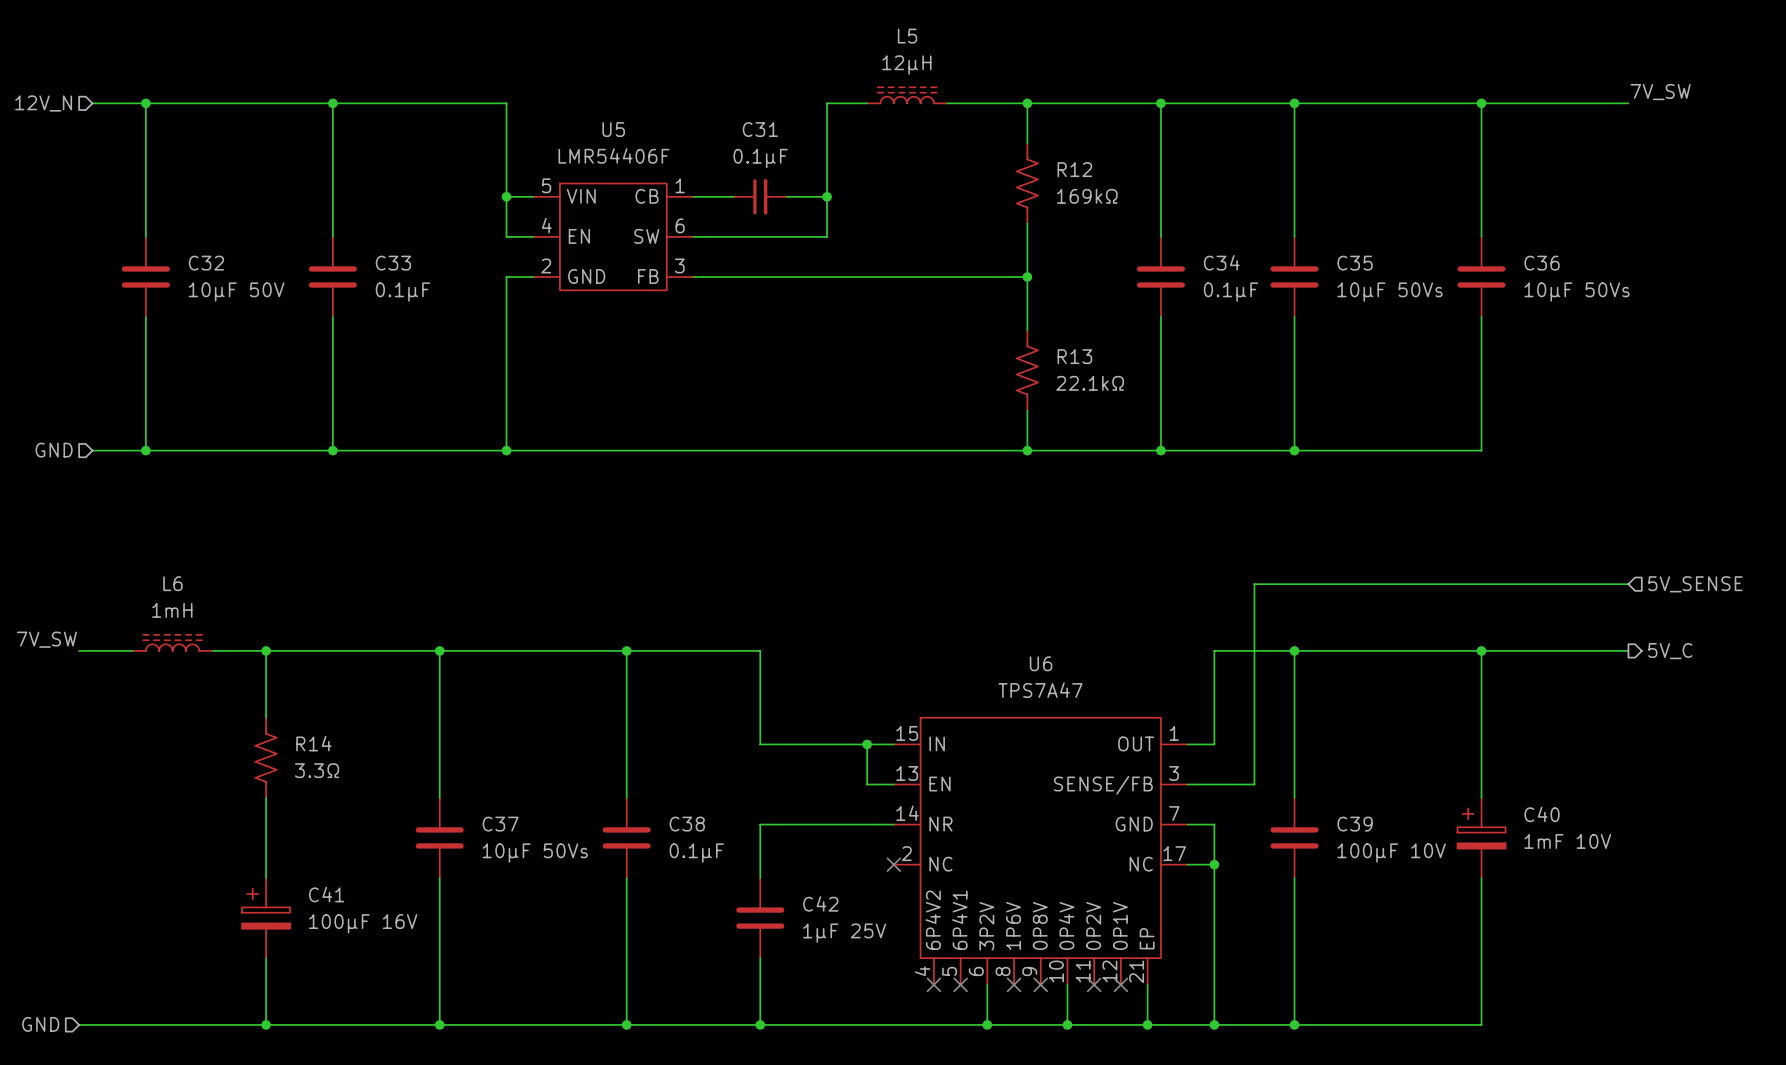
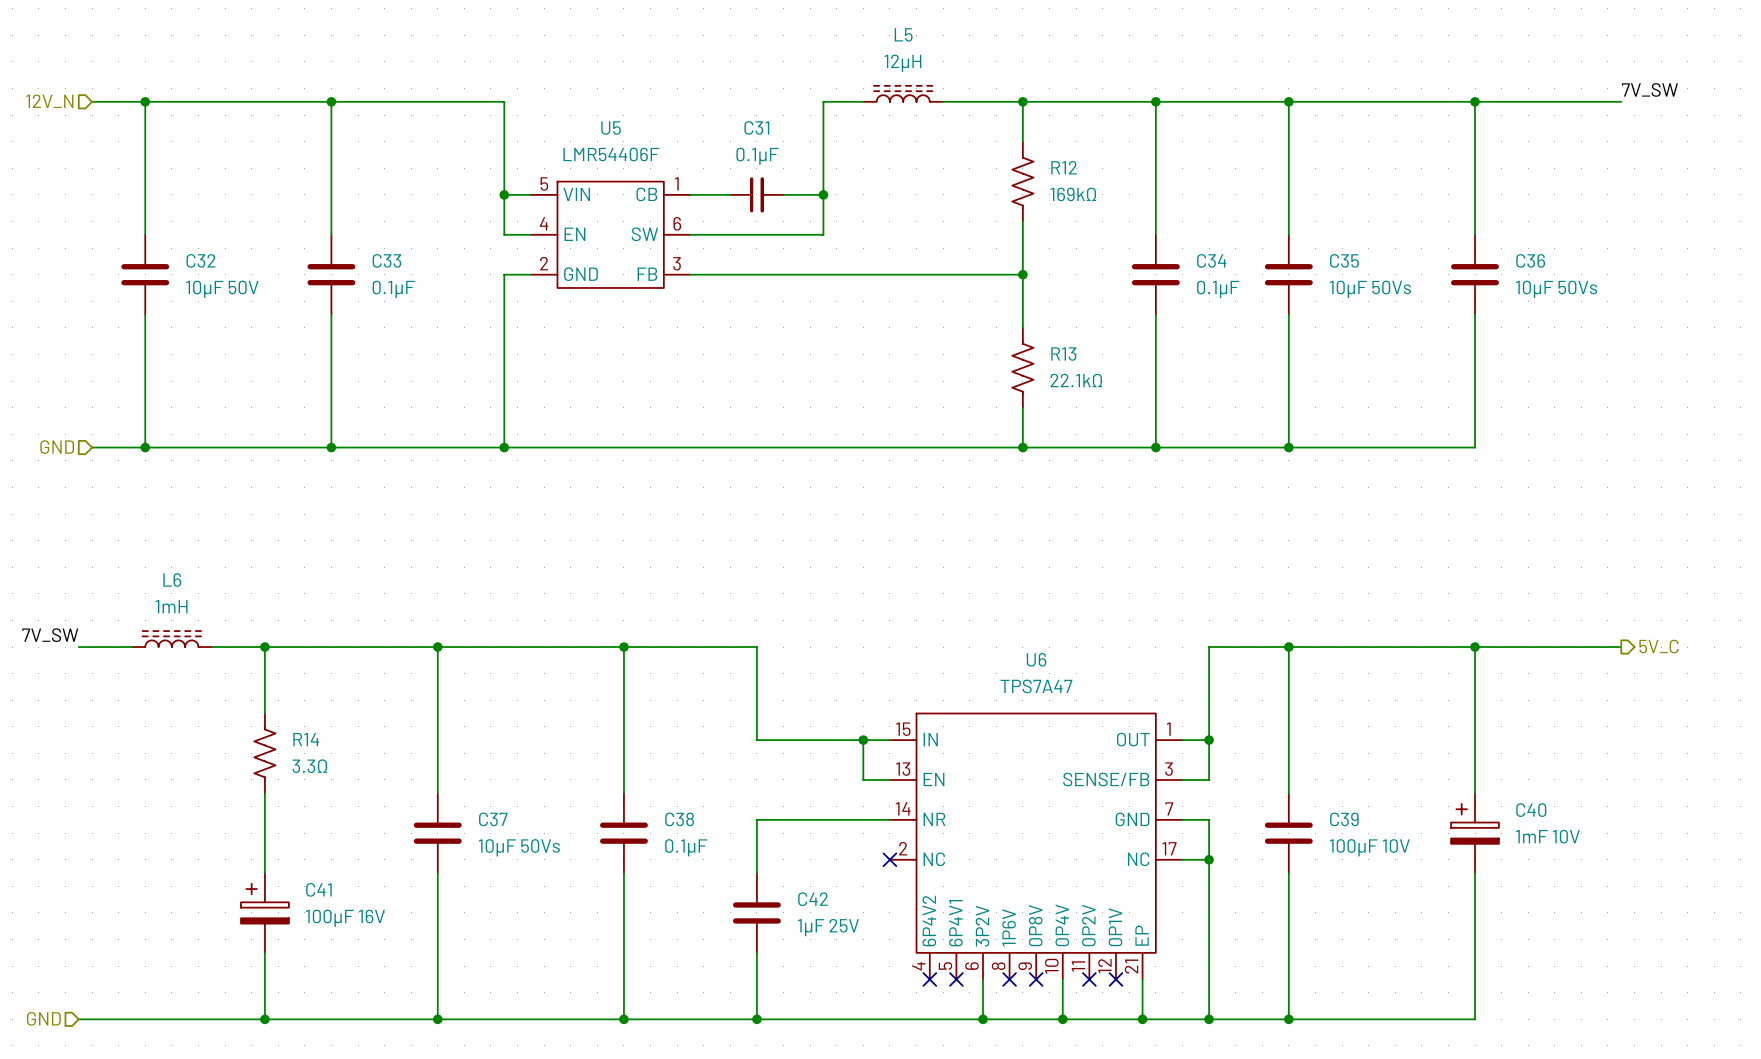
wire: (1628, 584) (1254, 584) (1254, 784) (1214, 784) -> (1209, 740) (1209, 779)
hierarchical label: 5V_SENSE (1695, 584) -> none
junction: none -> (1209, 740)

